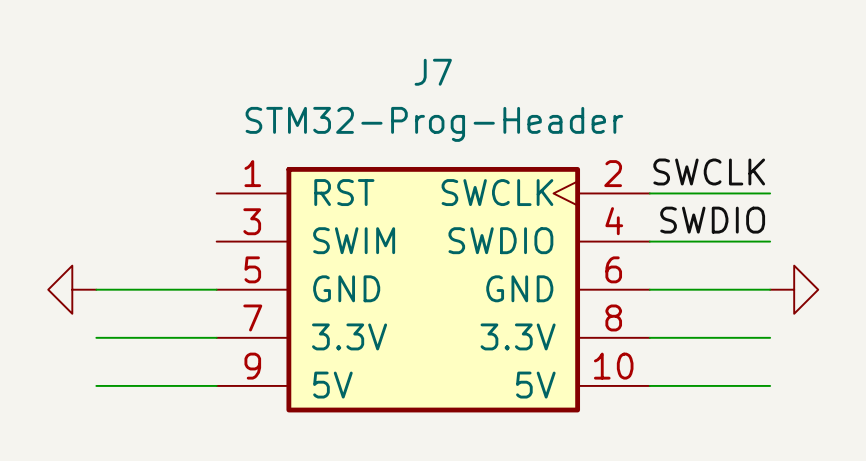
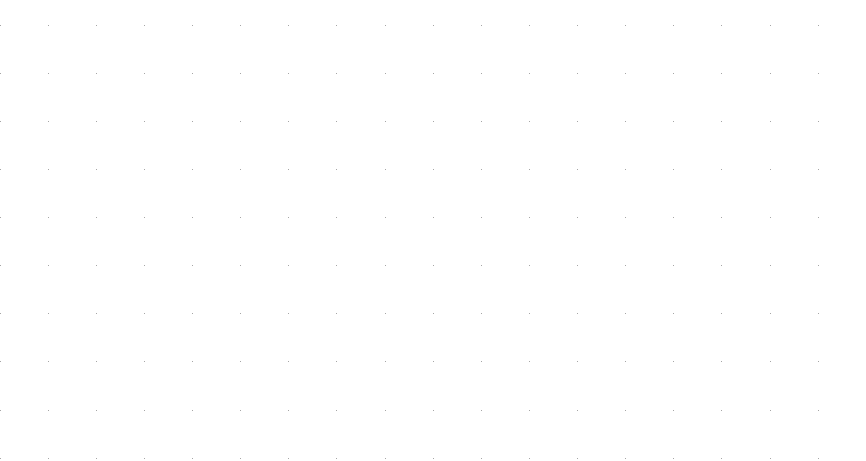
label: SWCLK (709, 171) -> none
wire: (649, 193) (770, 193) -> none
label: SWDIO (712, 220) -> none
wire: (649, 241) (770, 241) -> none
power symbol: (72, 289) -> none
wire: (96, 289) (216, 289) -> none
J7: STM32-Prog-Header (433, 289) -> none
wire: (649, 289) (770, 289) -> none
power symbol: (794, 289) -> none
wire: (96, 337) (216, 337) -> none
wire: (649, 337) (770, 337) -> none
wire: (96, 385) (216, 385) -> none
wire: (649, 385) (770, 385) -> none

